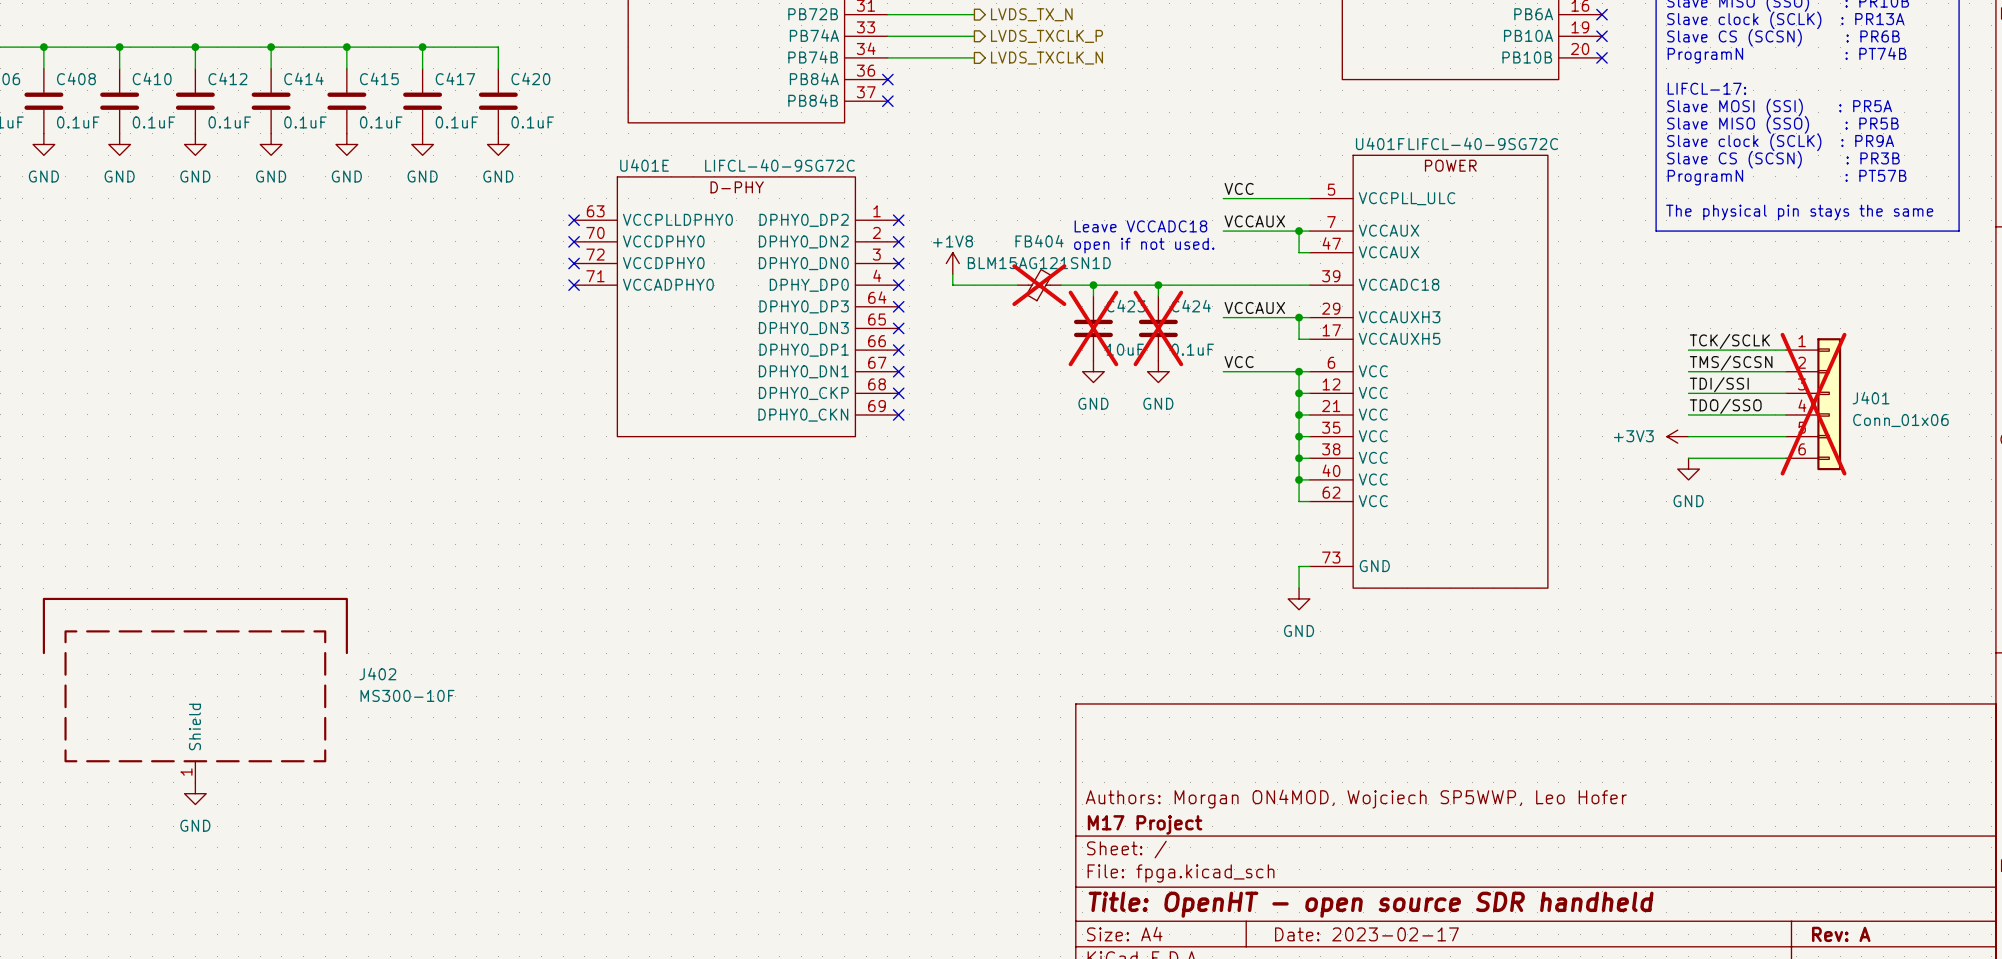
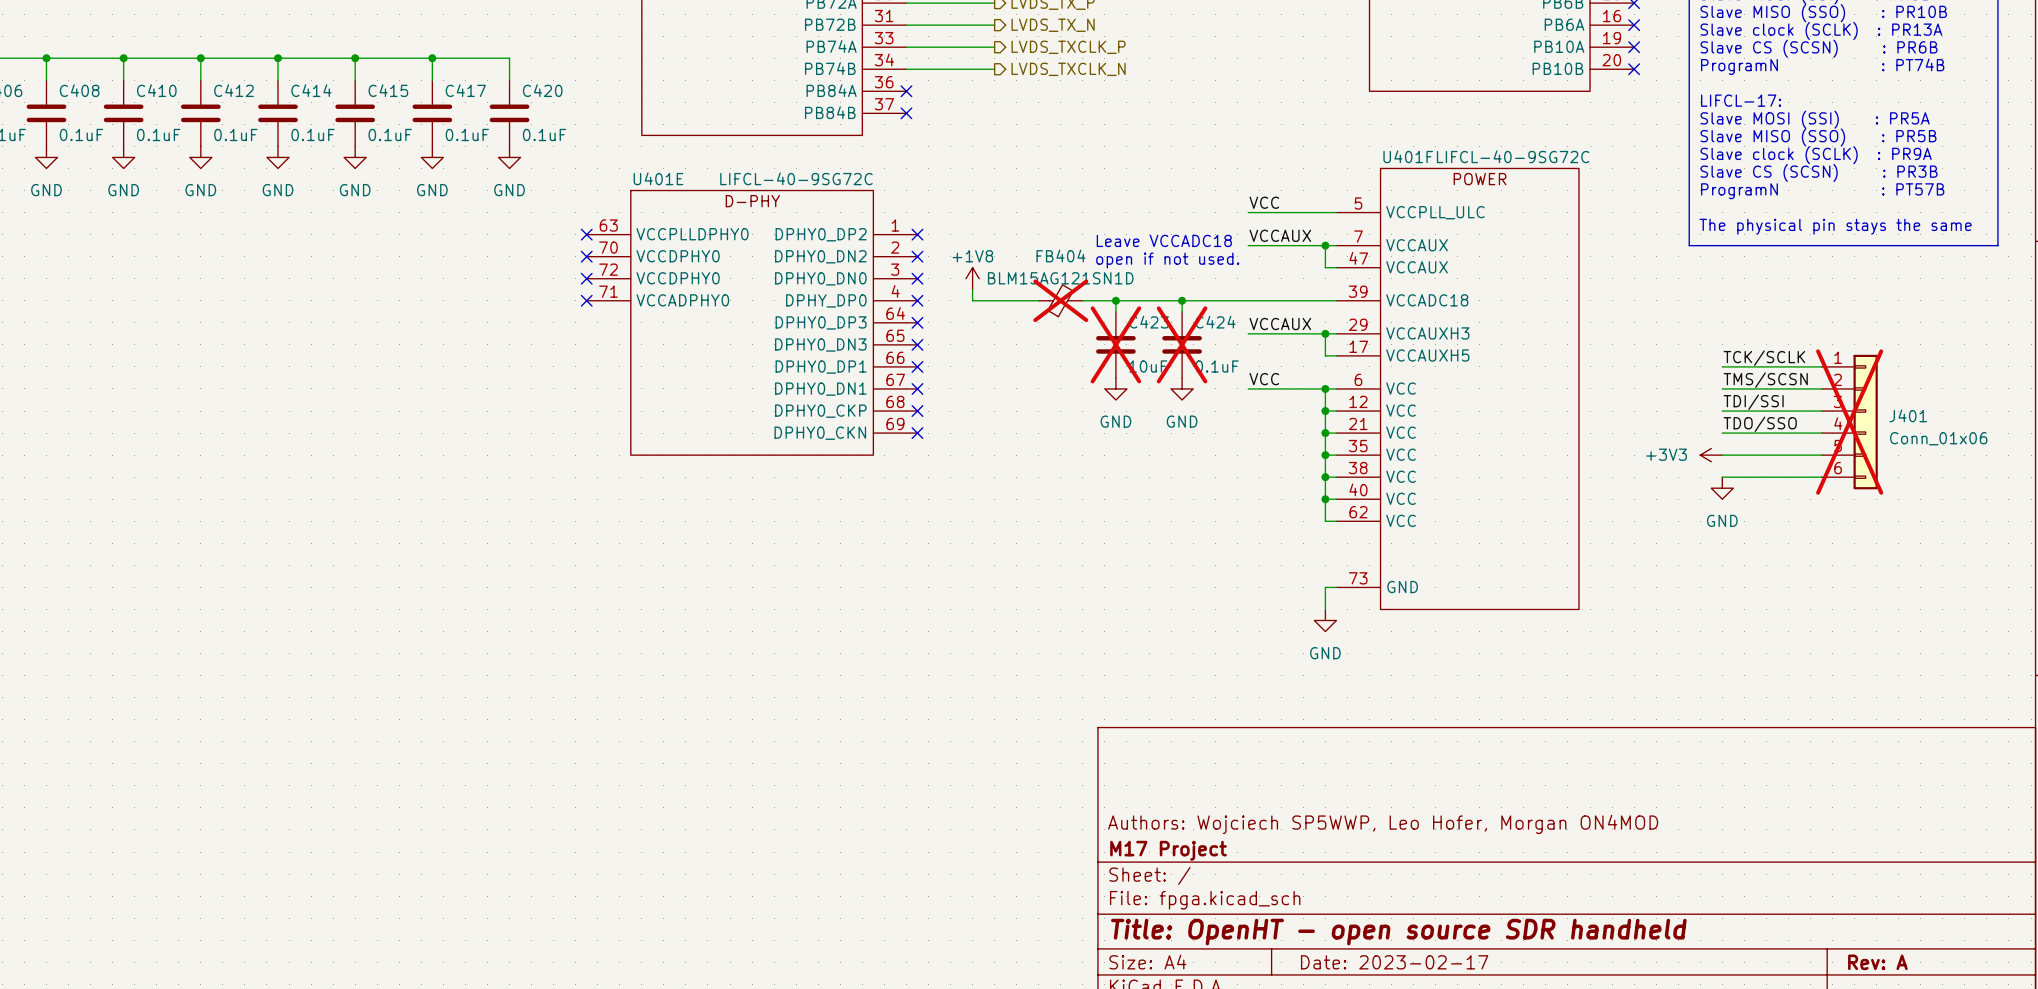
J402: MS300-10F (195, 690) -> none
power symbol: GND (195, 793) -> none
title block: Authors: Morgan ON4MOD, Wojciech SP5WWP, Leo Hofer (1356, 799) -> Authors: Wojciech SP5WWP, Leo Hofer, Morgan ON4MOD (1383, 824)

